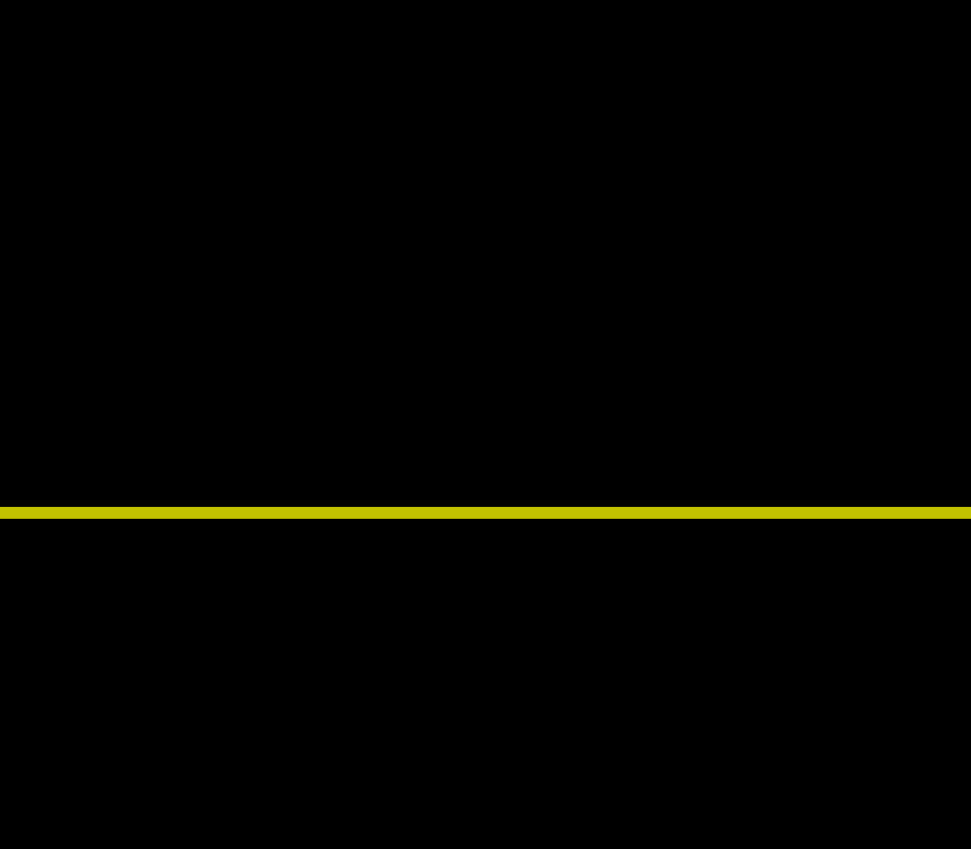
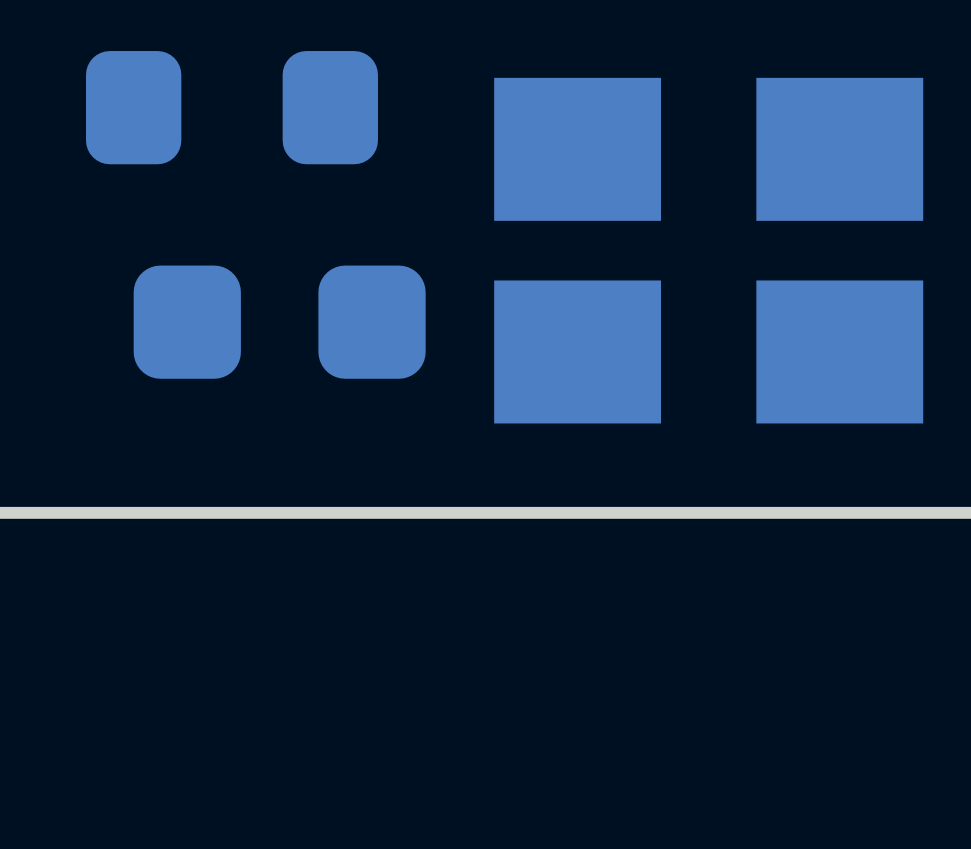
part: none -> (231, 107)
part: none -> (708, 250)
part: none -> (279, 322)

